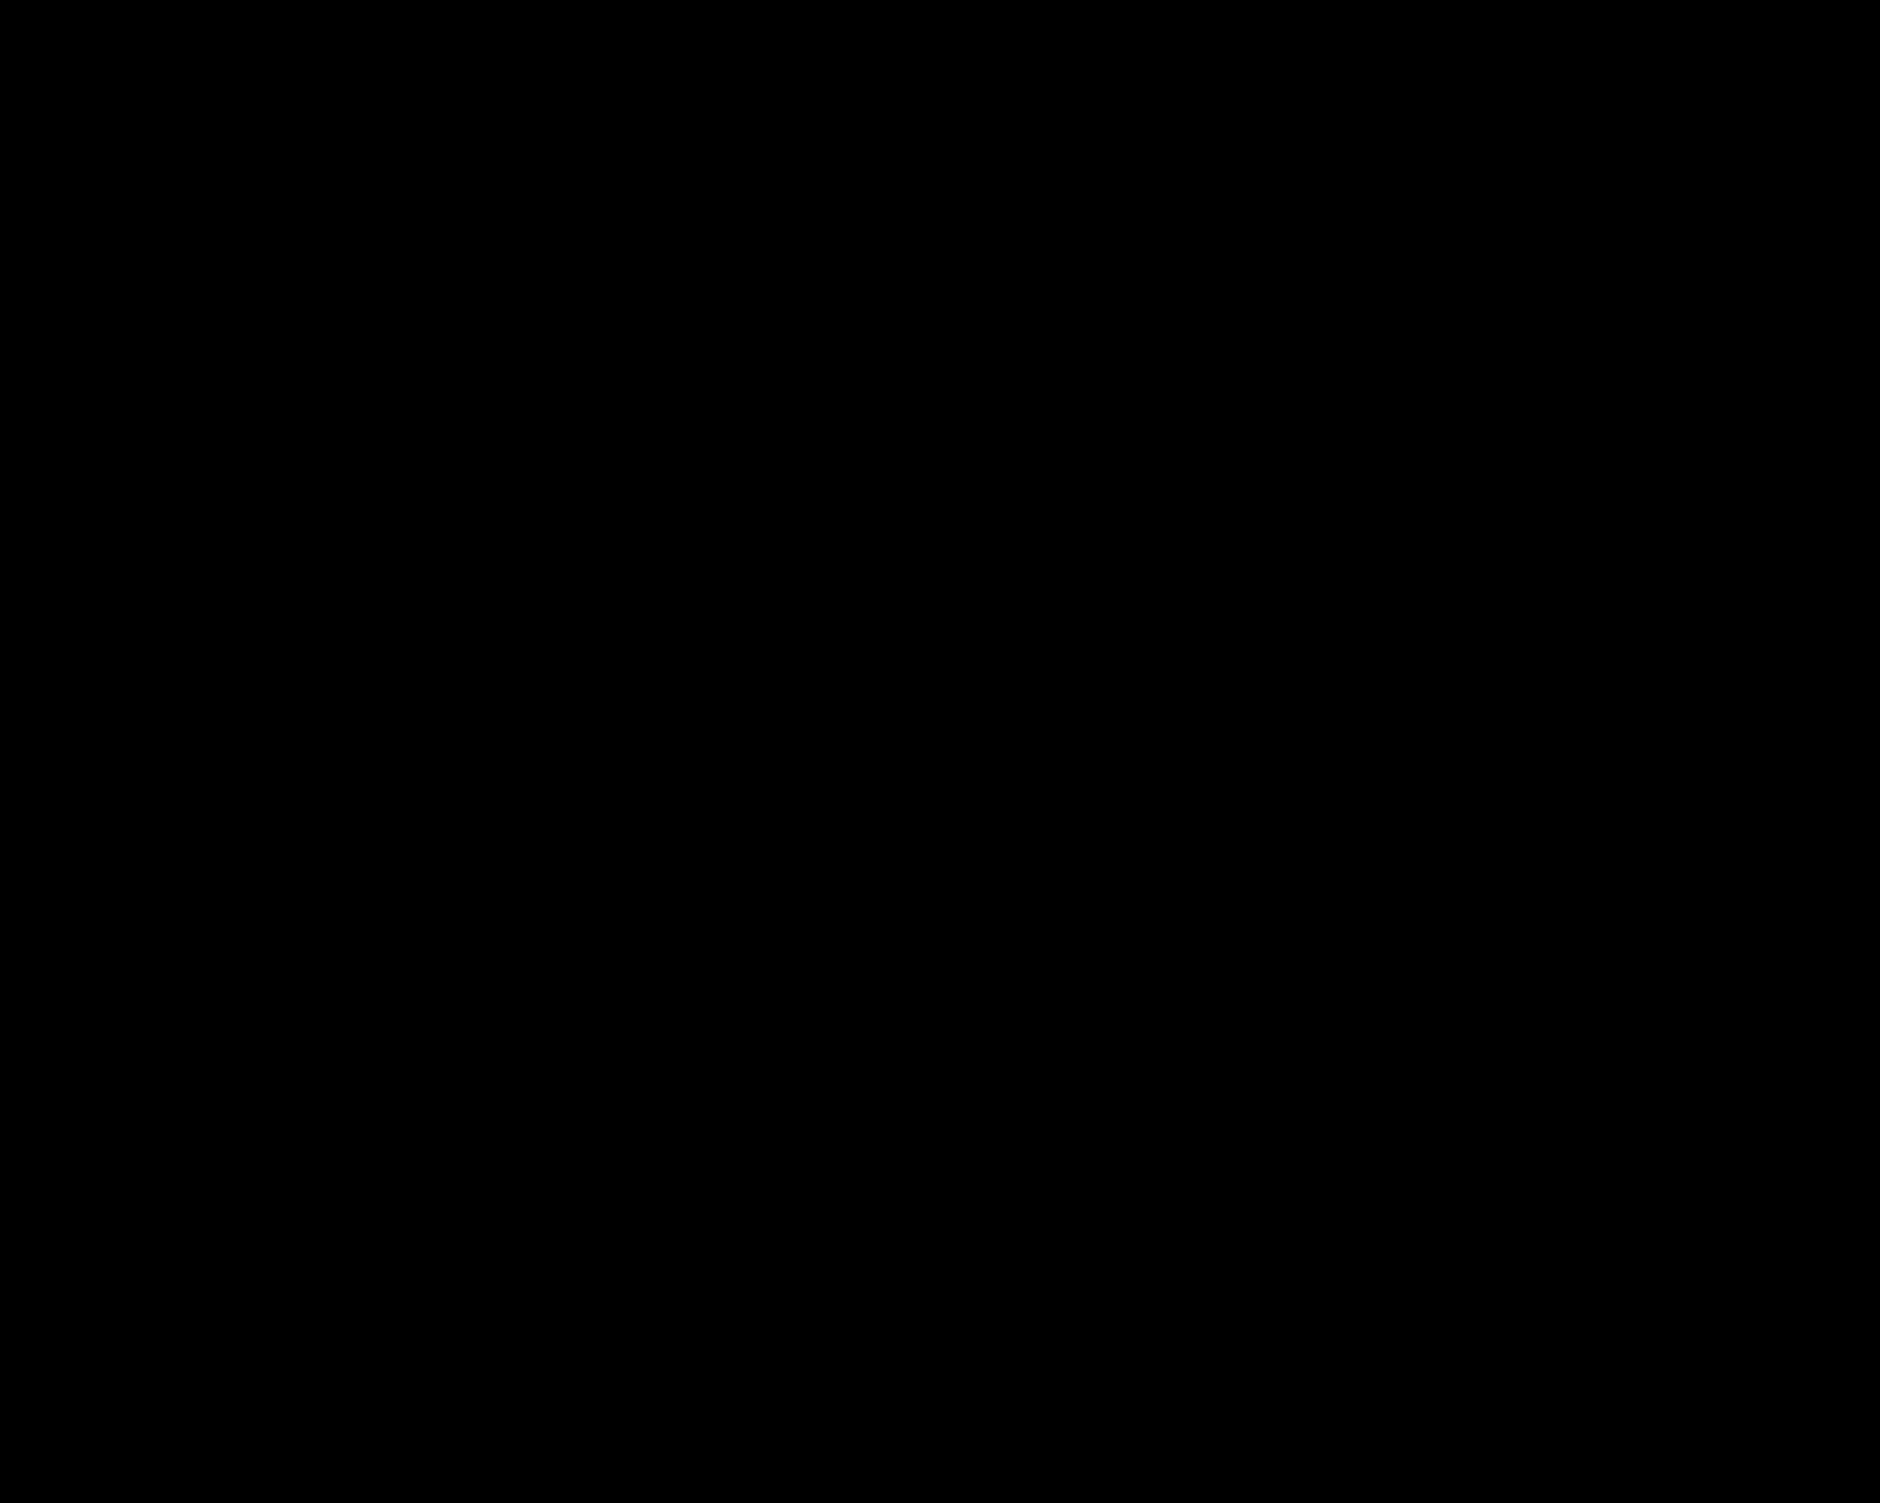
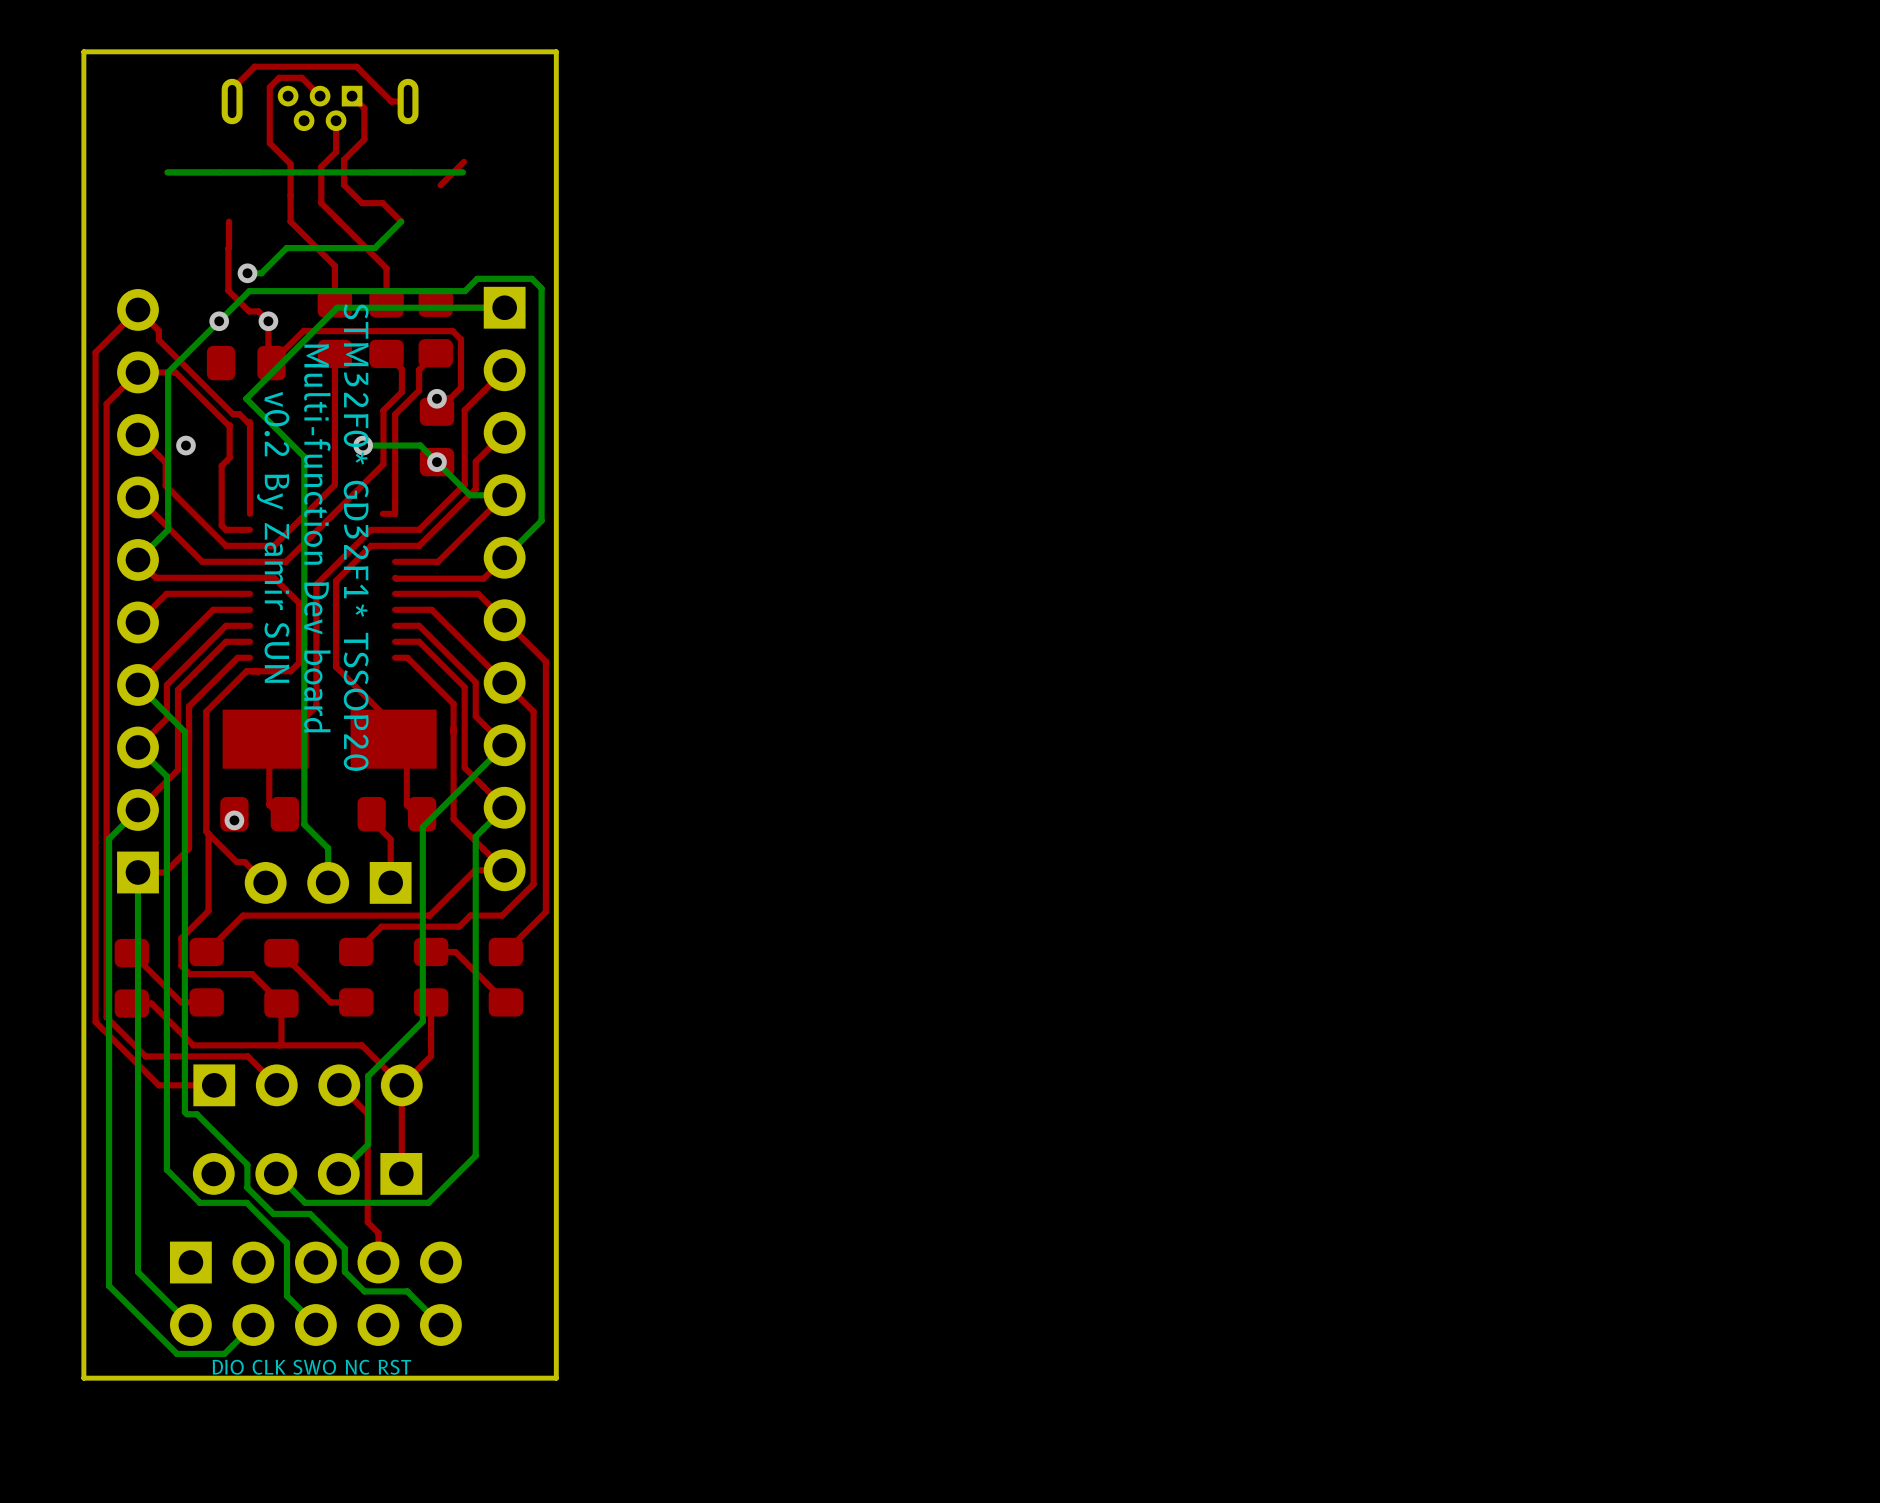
board edge: none -> (556, 51) (83, 51) (83, 1378) (556, 1378) (556, 51)
top track: none -> (320, 96) (301, 77) (279, 77) (269, 87) (269, 143) (290, 164) (290, 221) (334, 265) (334, 303)
top track: none -> (352, 96) (364, 108) (364, 139) (344, 159) (344, 185) (362, 203) (382, 203) (401, 221)
top track: none -> (408, 101) (391, 101) (356, 66) (254, 66) (232, 89) (232, 101)
part: none -> (320, 104)
top track: none -> (336, 120) (336, 152) (321, 166) (321, 203) (386, 268) (386, 303)
top track: none -> (464, 161) (440, 185)
bottom track: none -> (462, 172) (167, 172)
top track: none -> (229, 221) (228, 290) (249, 311) (258, 311) (268, 321) (268, 360) (271, 363) (303, 331) (452, 331) (460, 339) (460, 387) (450, 398) (436, 398)
bottom track: none -> (401, 221) (374, 248) (286, 248) (261, 273) (247, 273)
via: none -> (247, 273)
bottom track: none -> (498, 301) (504, 307) (337, 307) (246, 398) (304, 456) (304, 824) (328, 848) (328, 882)
via: none -> (219, 321)
via: none -> (268, 321)
part: none -> (334, 328)
part: none -> (386, 328)
part: none -> (435, 328)
top track: none -> (334, 353) (334, 484) (273, 545) (225, 545) (165, 485) (165, 462) (138, 434)
top track: none -> (386, 353) (401, 369) (401, 392) (383, 410) (383, 464) (285, 561) (202, 561) (138, 497)
top track: none -> (435, 353) (419, 369) (419, 390) (395, 414) (395, 513) (382, 513)
part: none -> (246, 363)
top track: none -> (504, 370) (464, 410) (464, 484) (419, 529) (371, 529) (316, 584) (316, 706) (270, 751) (257, 751)
via: none -> (436, 398)
top track: none -> (249, 421) (249, 513)
top track: none -> (249, 424) (239, 414) (233, 414) (158, 340) (158, 330) (138, 309) (95, 352) (95, 1021) (158, 1085) (214, 1085)
top track: none -> (504, 432) (475, 461) (475, 489) (419, 545) (371, 545) (336, 580) (336, 667) (385, 716) (385, 751)
part: none -> (436, 436)
via: none -> (185, 445)
bottom track: none -> (363, 445) (420, 445) (470, 495) (504, 495)
via: none -> (363, 445)
via: none -> (436, 462)
top track: none -> (504, 495) (438, 561) (395, 561)
top track: none -> (249, 529) (225, 529) (221, 525) (221, 465) (229, 457) (229, 425) (175, 372) (138, 372) (106, 403) (106, 1017) (145, 1056) (247, 1056) (276, 1085)
text: none -> v0.2 By Zamir SUN (273, 537)
text: none -> STM32F0* GD32F1* TSSOP20 (356, 537)
text: none -> Multi-function Dev board (317, 538)
top track: none -> (504, 557) (483, 578) (395, 577)
bottom track: none -> (504, 557) (541, 520) (541, 288) (531, 278) (477, 278) (465, 291) (249, 291) (168, 372) (168, 529) (138, 559)
top track: none -> (138, 559) (155, 577) (273, 577) (299, 603) (299, 662) (290, 671) (246, 671) (206, 711) (206, 831) (236, 861) (244, 861) (265, 882)
part: none -> (504, 589)
part: none -> (138, 591)
top track: none -> (249, 593) (166, 593) (138, 622)
top track: none -> (395, 593) (478, 593) (545, 661) (545, 911) (505, 951)
top track: none -> (249, 609) (213, 609) (138, 684) (138, 680)
top track: none -> (395, 609) (431, 609) (533, 711) (533, 884) (502, 915) (470, 915) (459, 926) (381, 926) (356, 951)
top track: none -> (249, 625) (225, 625) (166, 684) (166, 718) (138, 747)
top track: none -> (395, 625) (419, 625) (475, 682) (475, 716) (504, 745)
top track: none -> (249, 641) (225, 641) (177, 689) (177, 769) (138, 809)
top track: none -> (395, 641) (419, 641) (464, 687) (464, 767) (504, 807)
top track: none -> (249, 657) (237, 657) (189, 706) (189, 848) (165, 872) (138, 872)
top track: none -> (395, 657) (407, 657) (453, 703) (453, 819) (504, 870) (475, 870) (429, 915) (243, 915) (206, 951)
bottom track: none -> (138, 684) (184, 731) (184, 1112) (186, 1114) (196, 1114) (247, 1164) (247, 1187) (273, 1213) (310, 1213) (344, 1248) (344, 1271) (364, 1291) (407, 1291) (440, 1325)
part: none -> (329, 739)
bottom track: none -> (504, 745) (422, 827) (422, 1021) (368, 1076) (368, 1144) (338, 1173)
bottom track: none -> (138, 747) (166, 776) (166, 1169) (199, 1202) (246, 1202) (286, 1243) (286, 1296) (315, 1325)
top track: none -> (396, 751) (396, 755) (406, 766) (406, 805) (422, 820)
top track: none -> (270, 762) (269, 805) (284, 820)
bottom track: none -> (504, 807) (475, 836) (475, 1155) (428, 1202) (305, 1202) (276, 1173)
bottom track: none -> (138, 809) (109, 838) (109, 1285) (177, 1353) (224, 1353) (253, 1325)
part: none -> (259, 814)
part: none -> (396, 814)
via: none -> (234, 820)
top track: none -> (371, 820) (390, 839) (390, 882)
top track: none -> (208, 833) (208, 911) (181, 938) (181, 965) (189, 974) (252, 974) (281, 1003) (281, 1043) (279, 1045)
bottom track: none -> (138, 872) (138, 1272) (190, 1325)
part: none -> (328, 882)
top track: none -> (431, 951) (455, 951) (505, 1002)
top track: none -> (131, 953) (181, 1002) (206, 1002)
top track: none -> (281, 953) (330, 1002) (356, 1002)
part: none -> (206, 977)
part: none -> (356, 977)
part: none -> (431, 977)
part: none -> (505, 977)
part: none -> (131, 978)
part: none -> (281, 978)
top track: none -> (431, 1002) (431, 1056) (401, 1085)
top track: none -> (131, 1003) (151, 1003) (193, 1045) (361, 1045) (401, 1085)
part: none -> (308, 1085)
top track: none -> (339, 1085) (367, 1113) (367, 1222) (378, 1232) (378, 1262)
top track: none -> (401, 1085) (401, 1173)
part: none -> (307, 1173)
part: none -> (315, 1293)
text: none -> DIO CLK SWO NC RST (311, 1367)

